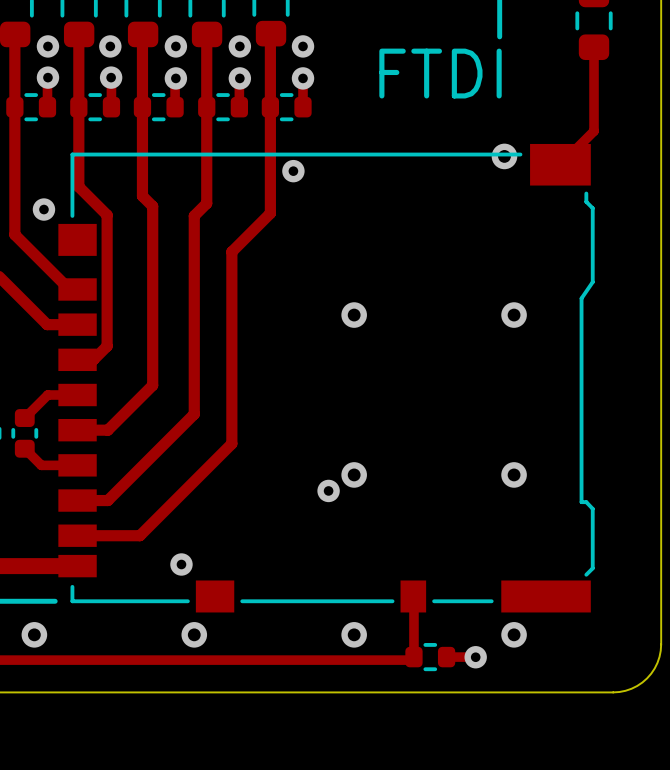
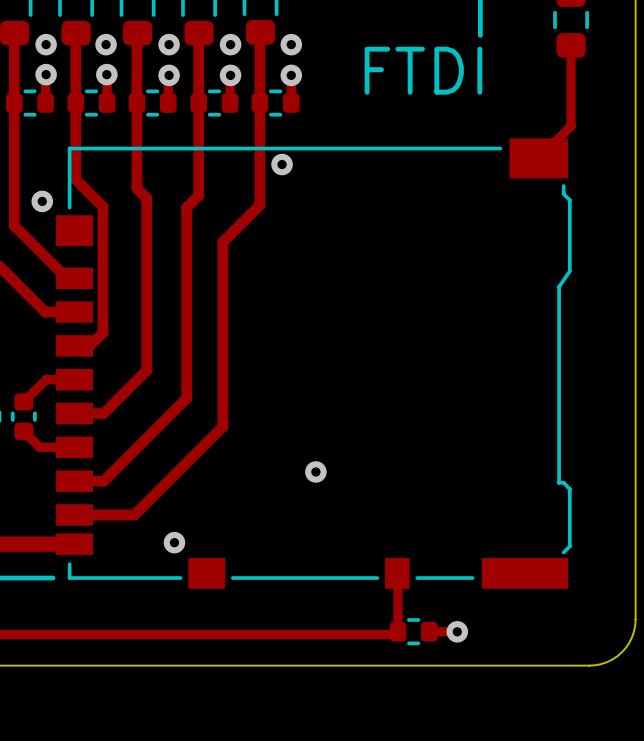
via: (504, 156) -> none
via: (354, 315) -> none
via: (514, 315) -> none
via: (354, 474) -> none
via: (514, 474) -> none
via: (34, 634) -> none
via: (194, 634) -> none
via: (354, 634) -> none
via: (514, 634) -> none

